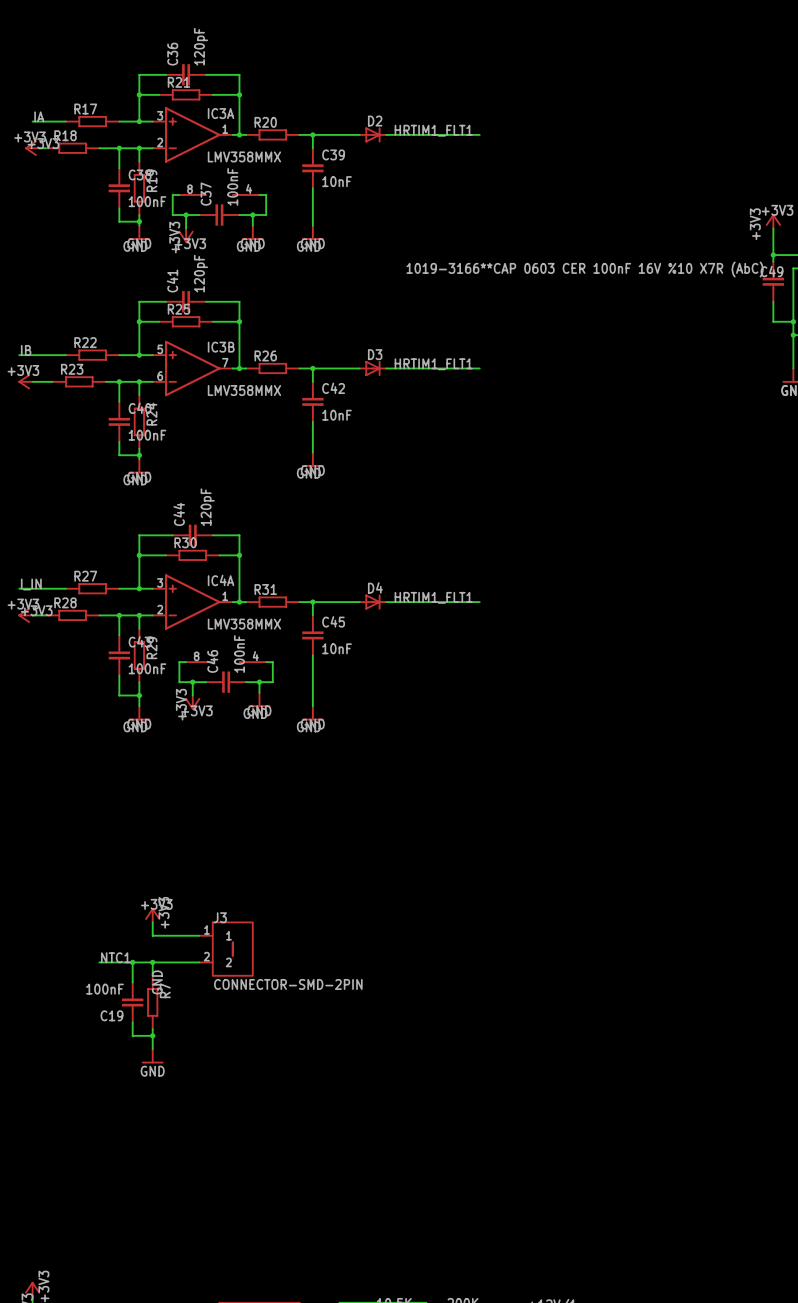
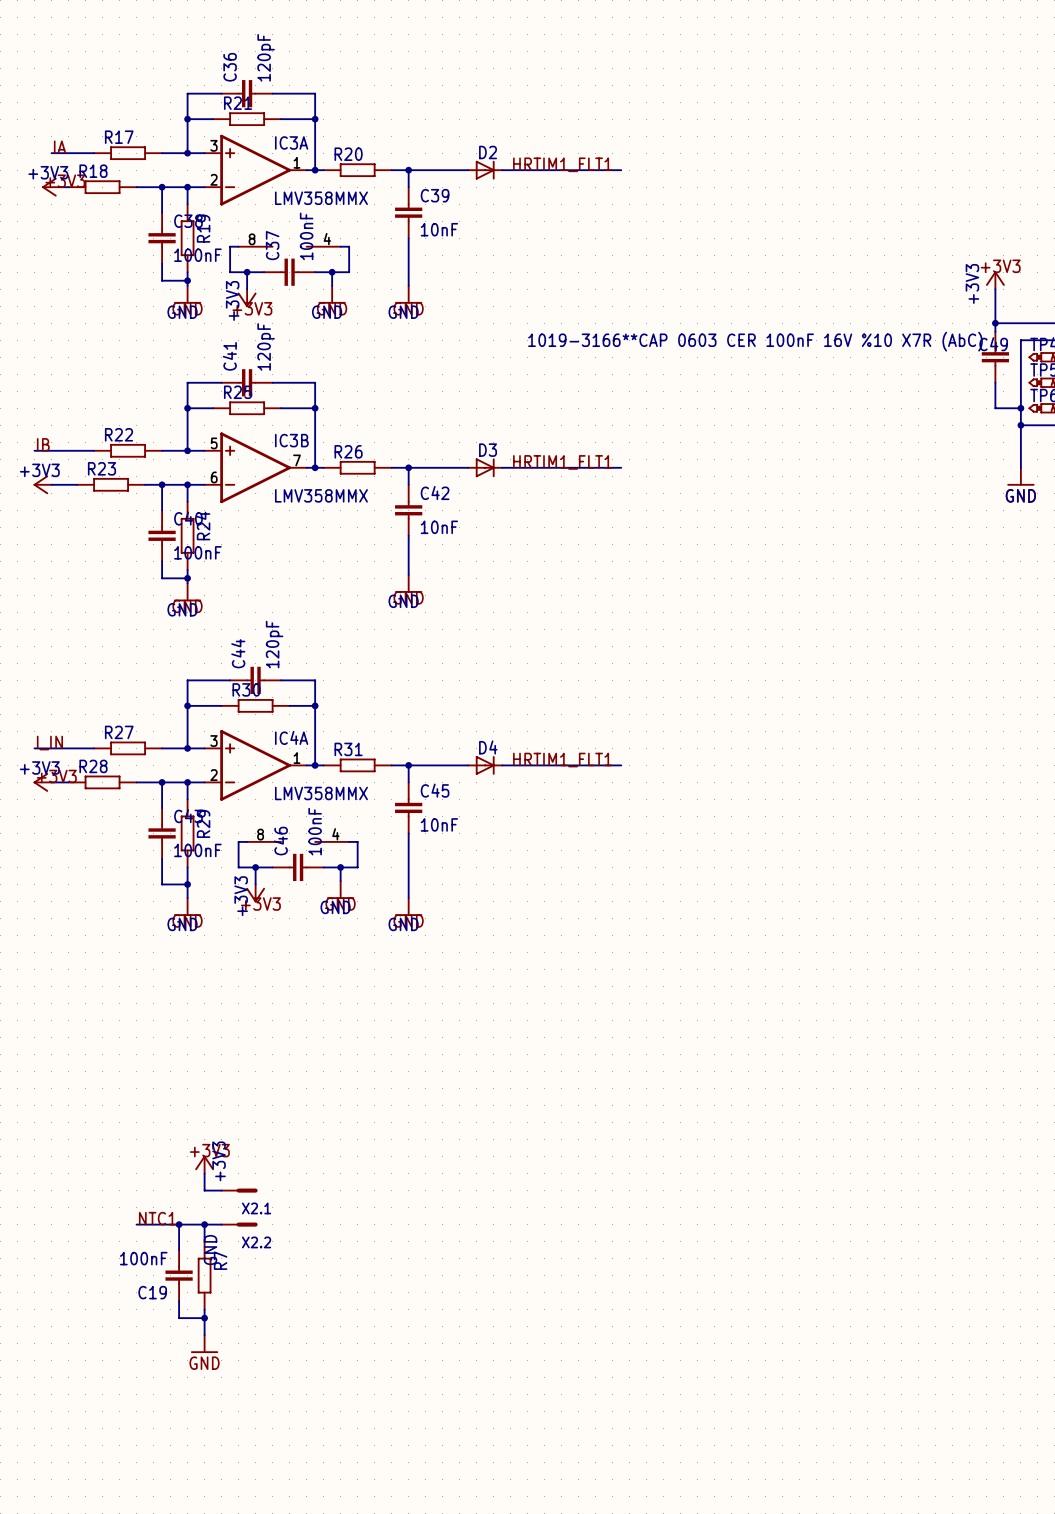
X2.1: none -> (239, 1190)
J3: CONNECTOR-SMD-2PIN (226, 949) -> none
X2.2: none -> (239, 1224)

